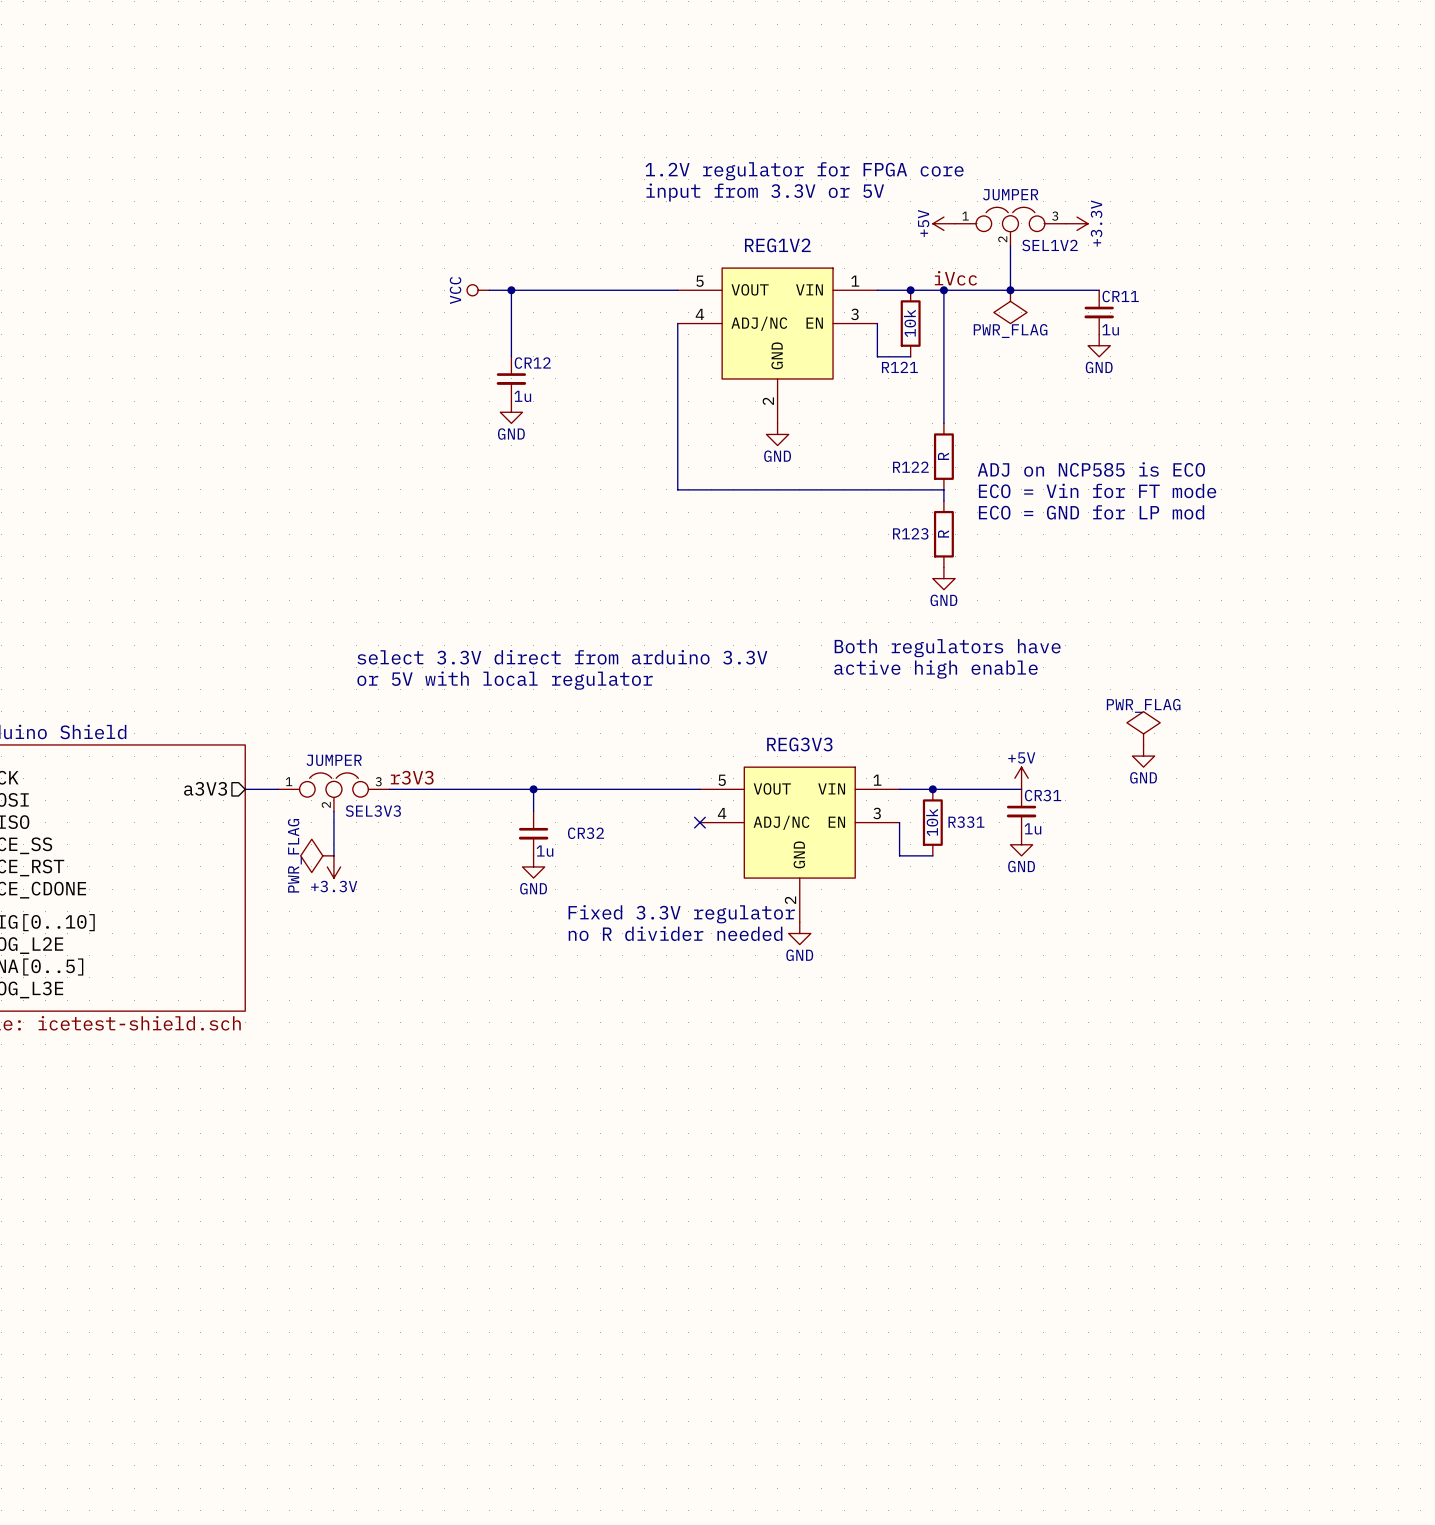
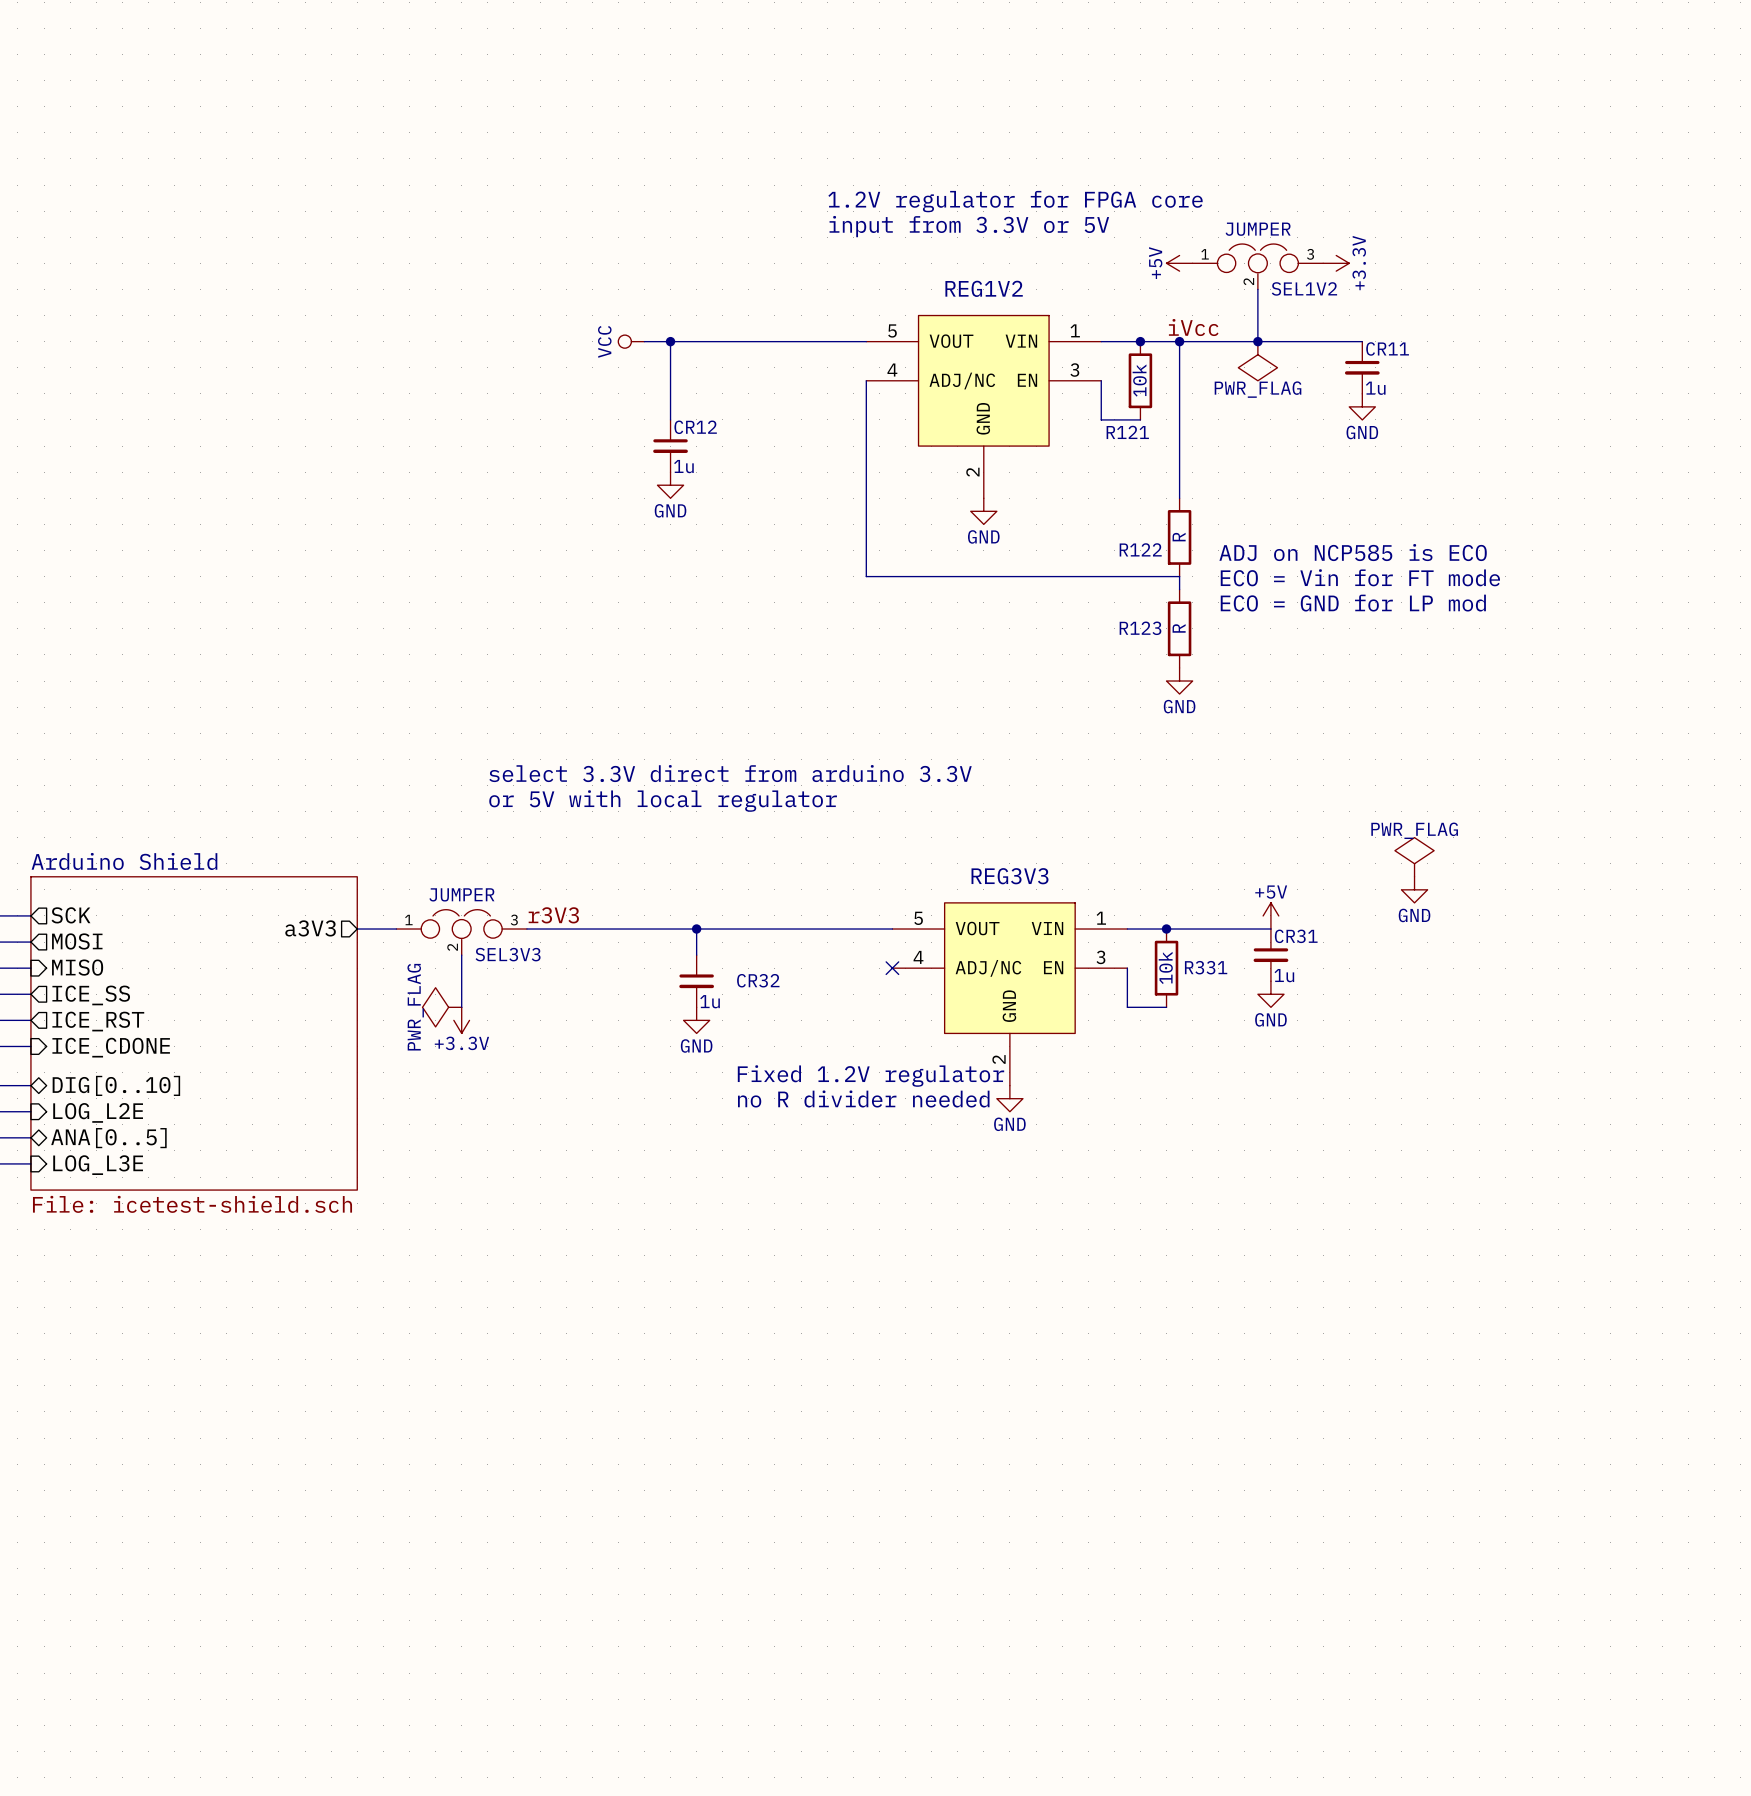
text: Both regulators have (947, 648) -> none
text: active high enable (935, 669) -> none
text: Fixed 3.3V regulator (681, 914) -> Fixed 1.2V regulator (870, 1076)

